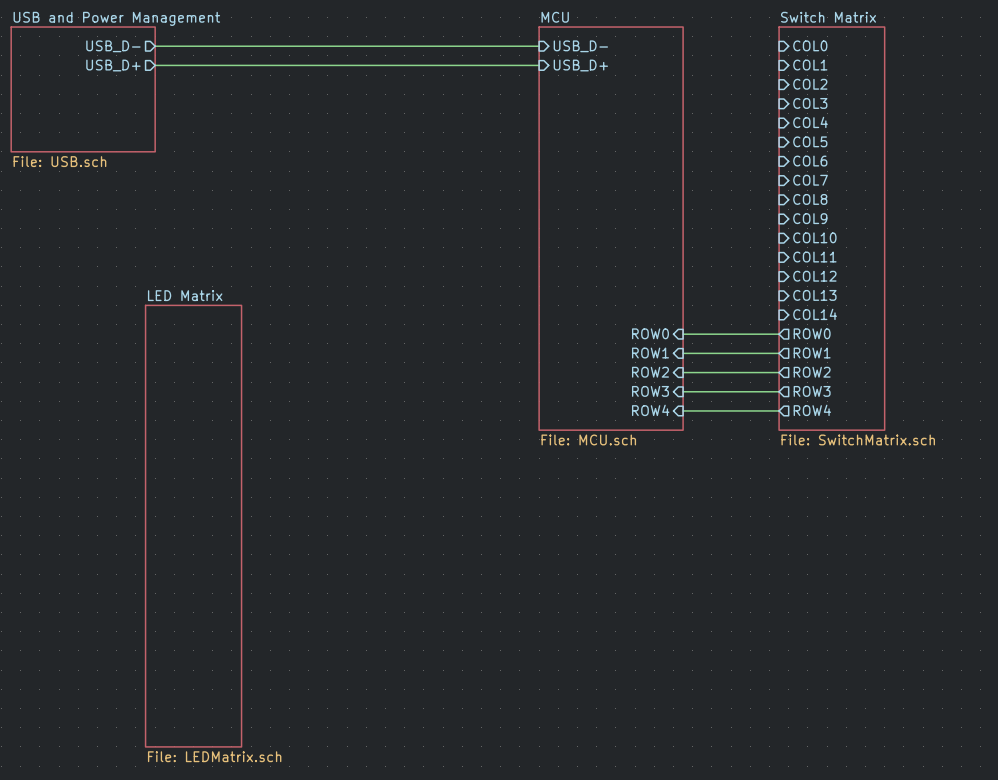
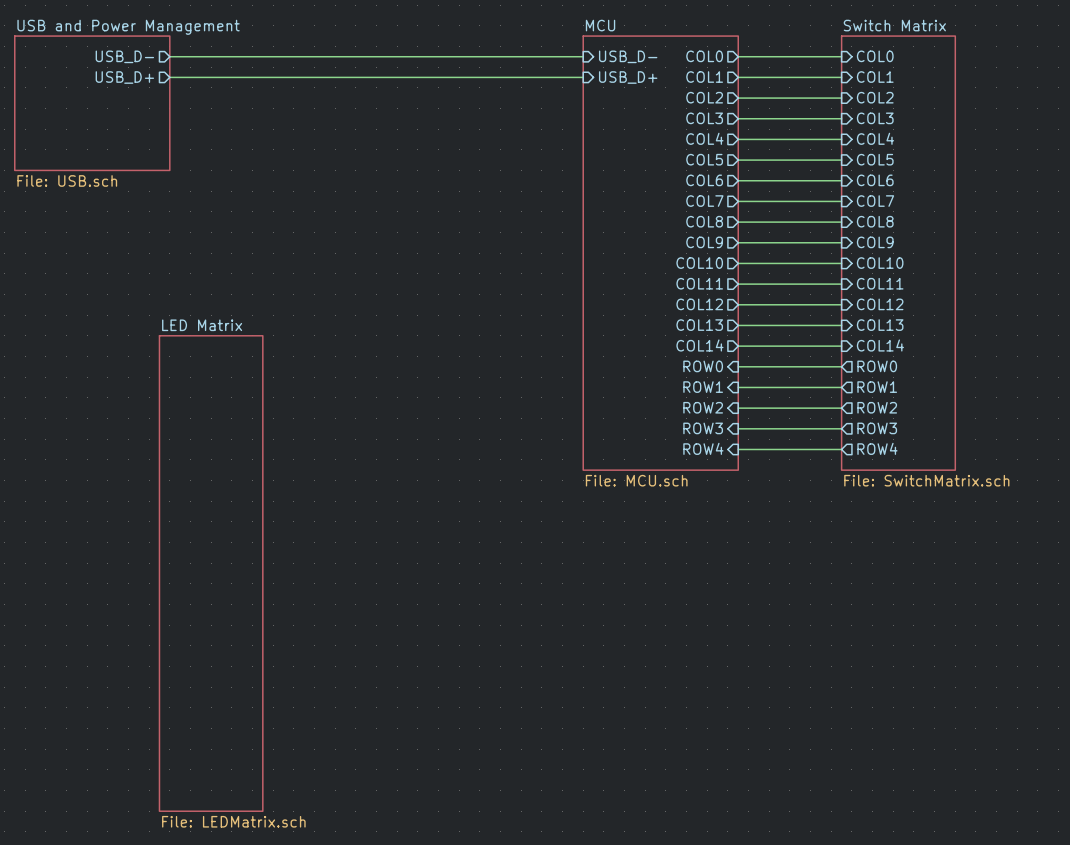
sheet pin: none -> COL0 (704, 56)
wire: none -> (738, 56) (841, 56)
sheet pin: none -> COL1 (704, 77)
wire: none -> (738, 77) (841, 77)
sheet pin: none -> COL2 (704, 97)
wire: none -> (738, 98) (841, 98)
sheet pin: none -> COL3 (704, 118)
wire: none -> (738, 118) (841, 118)
sheet pin: none -> COL4 (704, 138)
wire: none -> (738, 139) (841, 139)
sheet pin: none -> COL5 (704, 159)
wire: none -> (738, 160) (841, 160)
sheet pin: none -> COL6 (704, 180)
wire: none -> (738, 180) (841, 180)
sheet pin: none -> COL7 (704, 201)
wire: none -> (738, 201) (841, 201)
sheet pin: none -> COL8 (704, 221)
wire: none -> (738, 222) (841, 222)
sheet pin: none -> COL9 (704, 242)
wire: none -> (738, 242) (841, 242)
sheet pin: none -> COL10 (699, 263)
wire: none -> (738, 263) (841, 263)
sheet pin: none -> COL11 (699, 283)
wire: none -> (738, 284) (841, 284)
sheet pin: none -> COL12 (699, 304)
wire: none -> (738, 304) (841, 304)
sheet pin: none -> COL13 (699, 325)
wire: none -> (738, 325) (841, 325)
sheet pin: none -> COL14 (699, 345)
wire: none -> (738, 346) (841, 346)

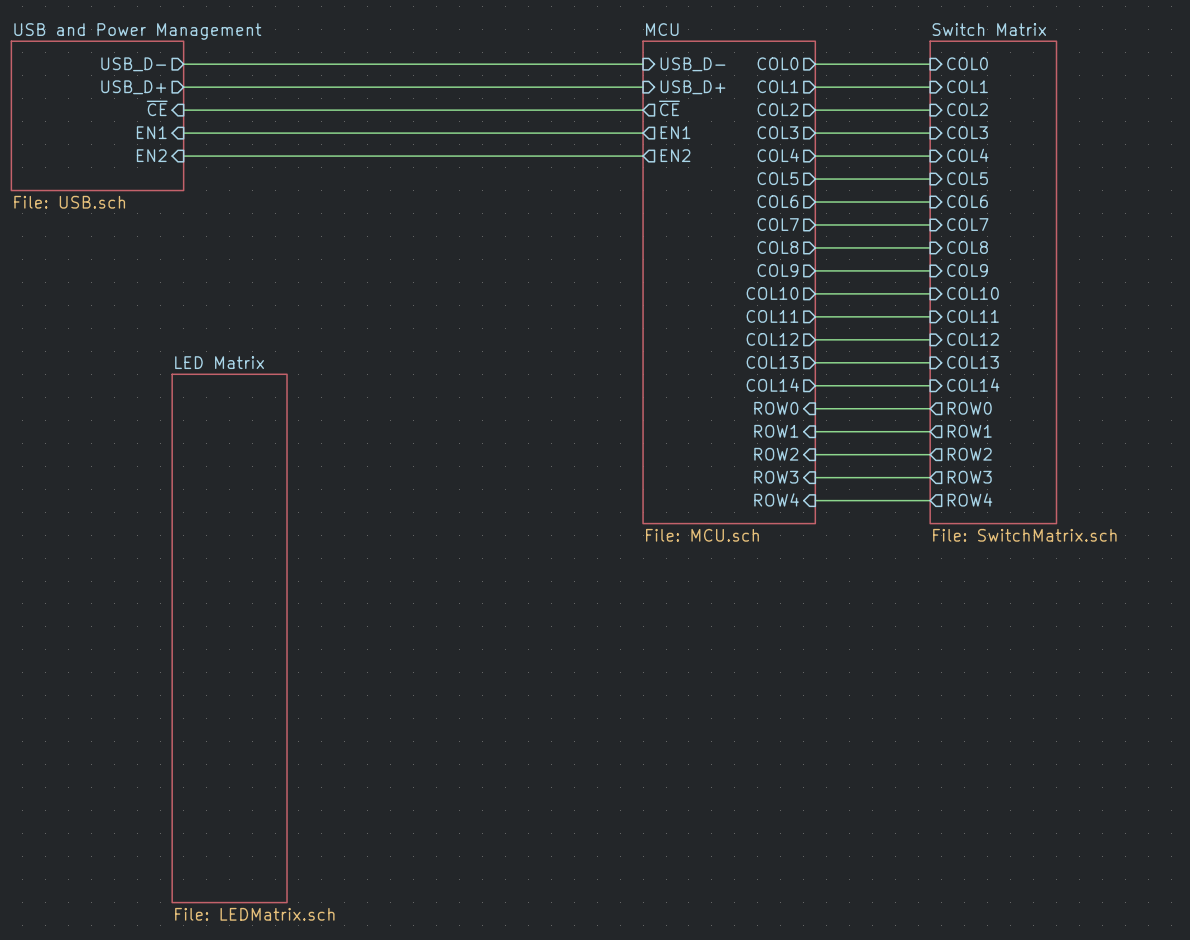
sheet pin: none -> ~{CE} (157, 108)
sheet pin: none -> ~{CE} (669, 108)
wire: none -> (183, 110) (643, 110)
sheet pin: none -> EN1 (151, 132)
wire: none -> (183, 133) (643, 133)
sheet pin: none -> EN1 (675, 132)
sheet pin: none -> EN2 (151, 155)
wire: none -> (183, 156) (643, 156)
sheet pin: none -> EN2 (675, 155)

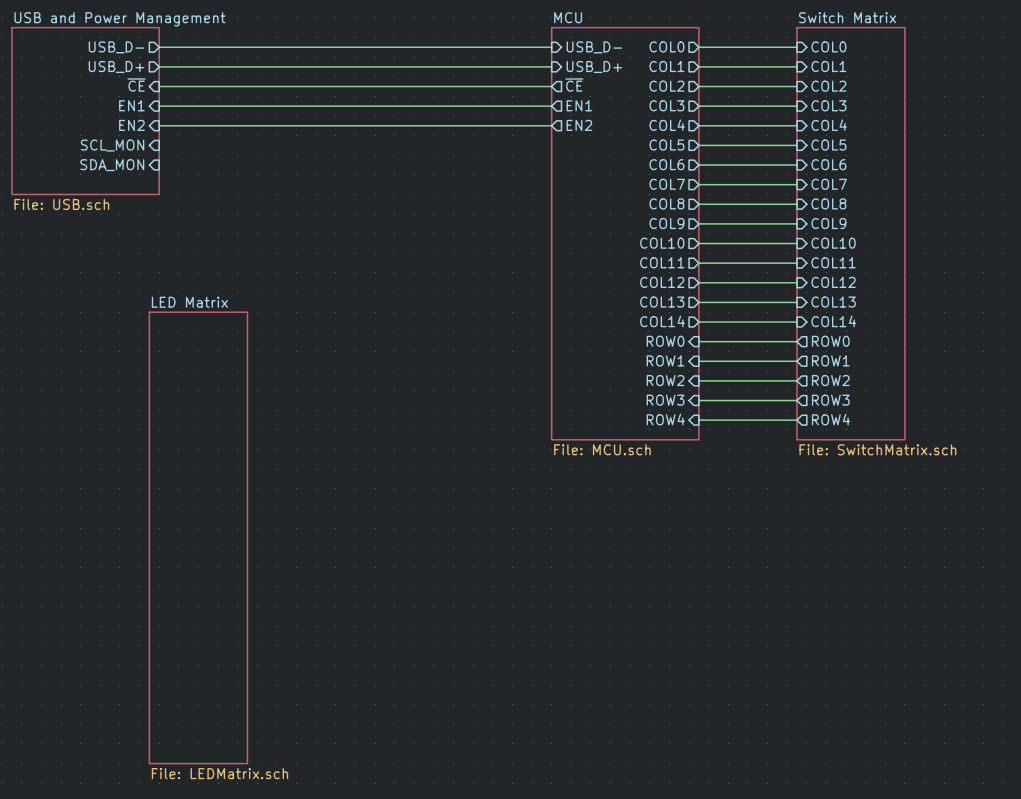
sheet USB and Power Management: File: USB.sch (97, 115) -> none
sheet USB and Power Management: none -> File: USB.sch (85, 111)
sheet pin: none -> SCL_MON (112, 145)
sheet pin: none -> SDA_MON (112, 165)

